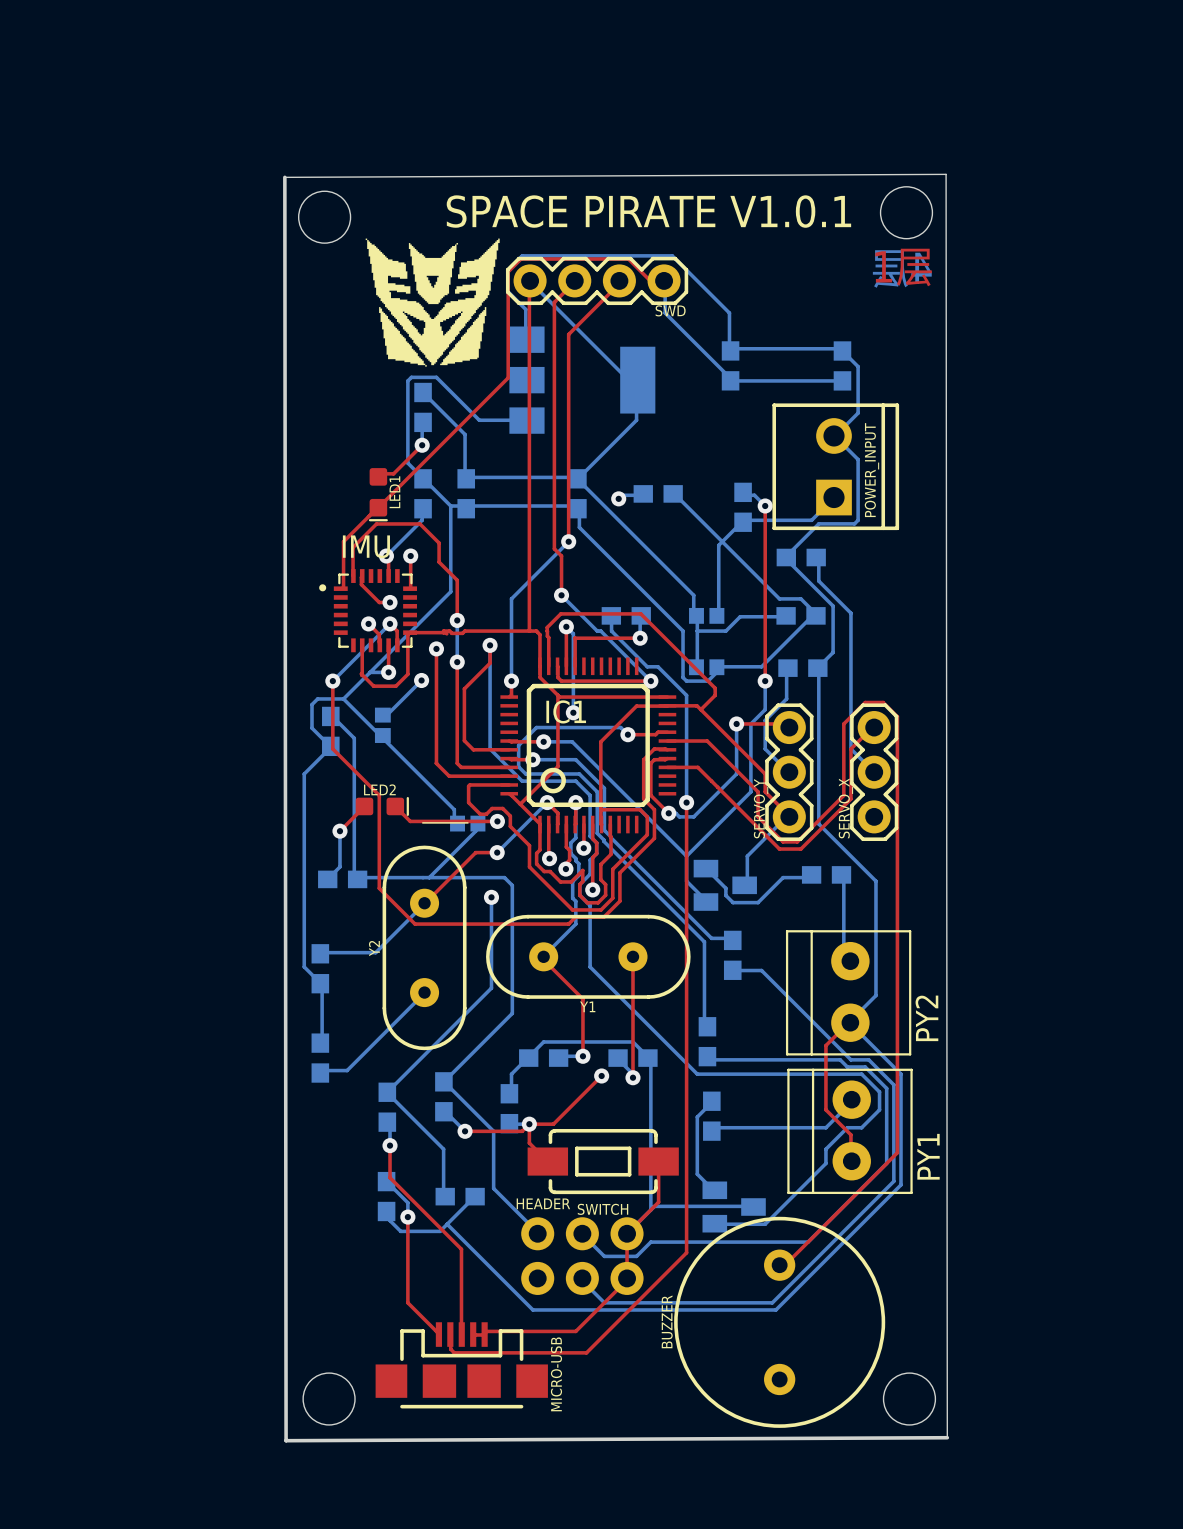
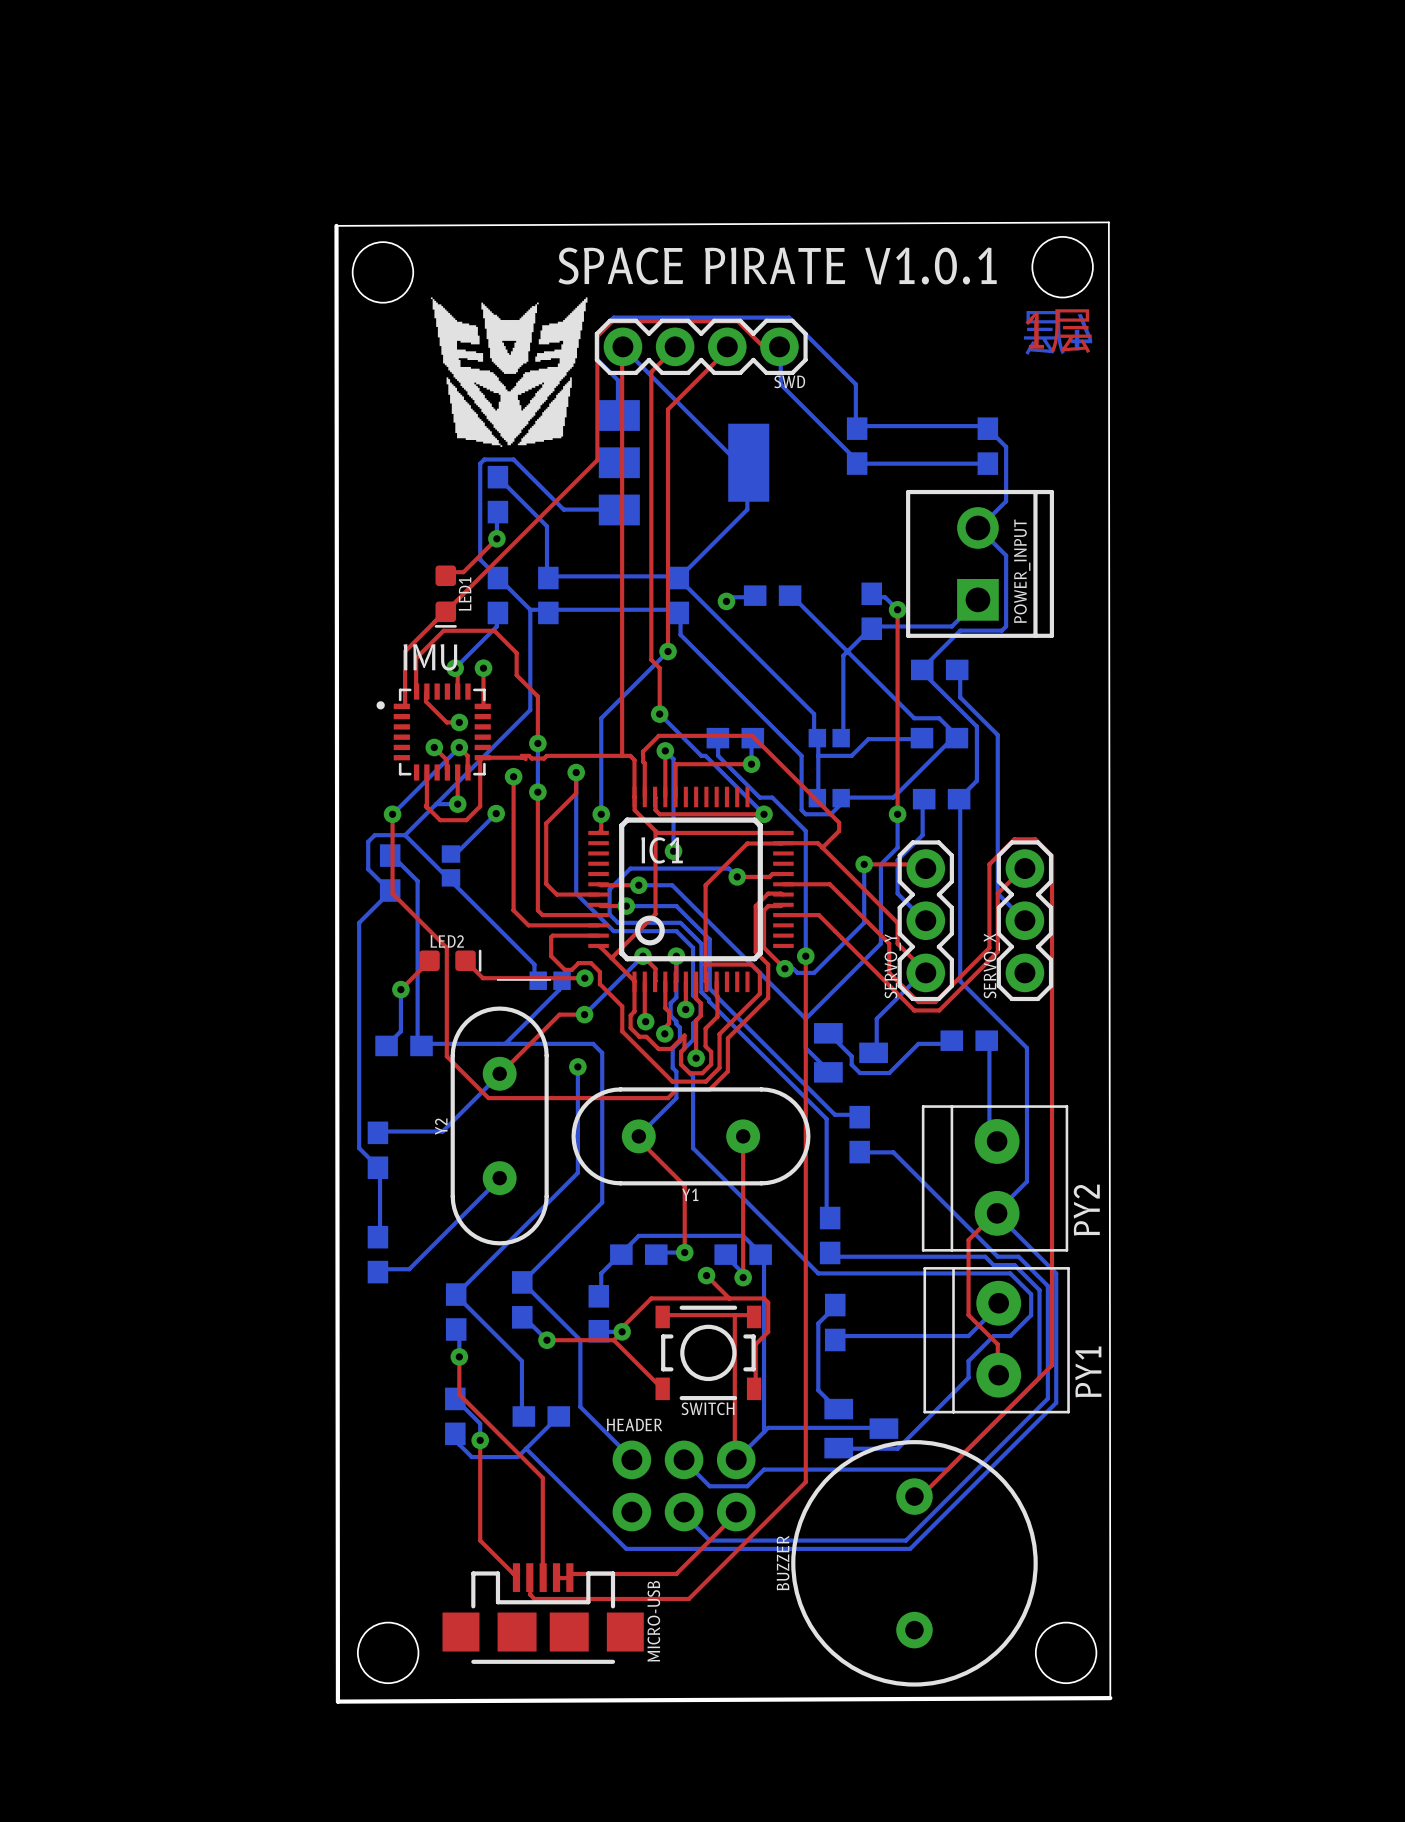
top track: (601, 1075) (553, 1124) (529, 1124) (529, 1143) (547, 1161) -> (706, 1275) (729, 1298)
top track: none -> (734, 1315) (736, 1459)
top track: none -> (662, 1316) (663, 1315) (751, 1315) (754, 1316)
top track: none -> (622, 1331) (622, 1327) (651, 1298) (764, 1298) (768, 1302) (768, 1331) (755, 1344) (755, 1386) (754, 1388)
top track: none -> (613, 1340) (662, 1388)
SWITCH: none -> (708, 1352)
SWITCH: (603, 1161) -> none
top track: (658, 1161) (658, 1202) (627, 1233) (627, 1278) -> none

